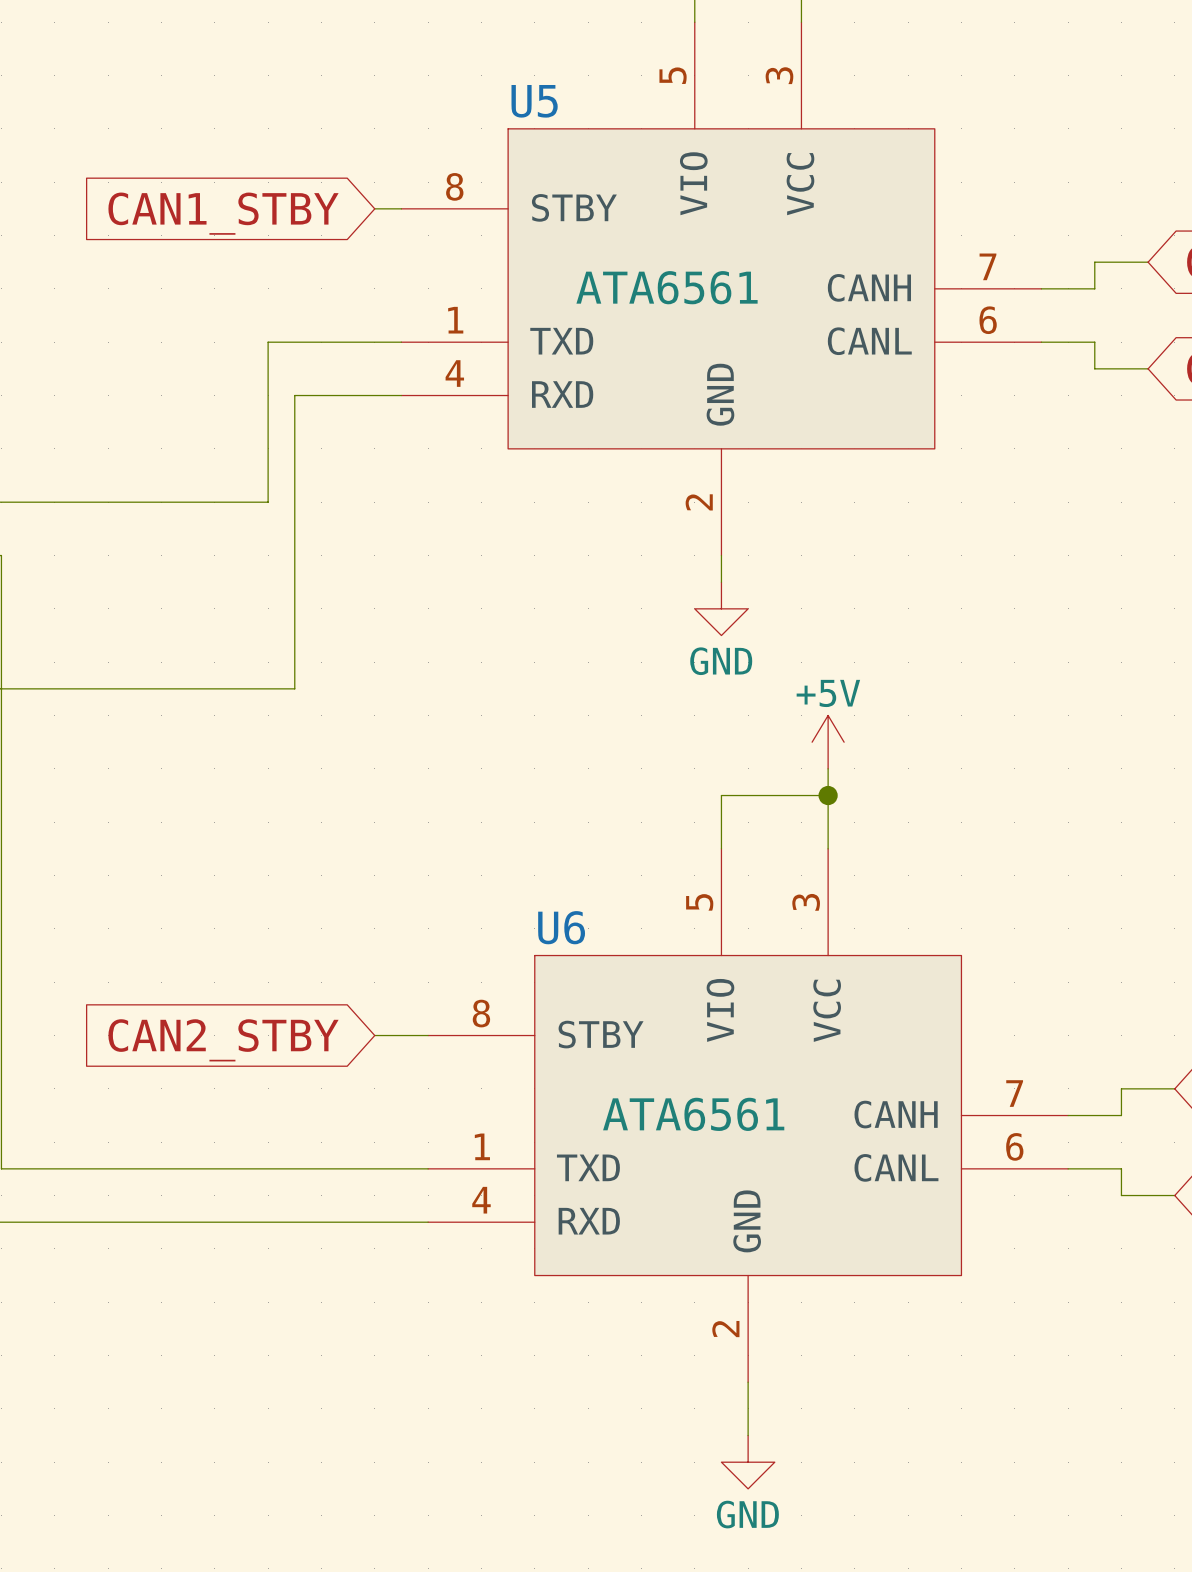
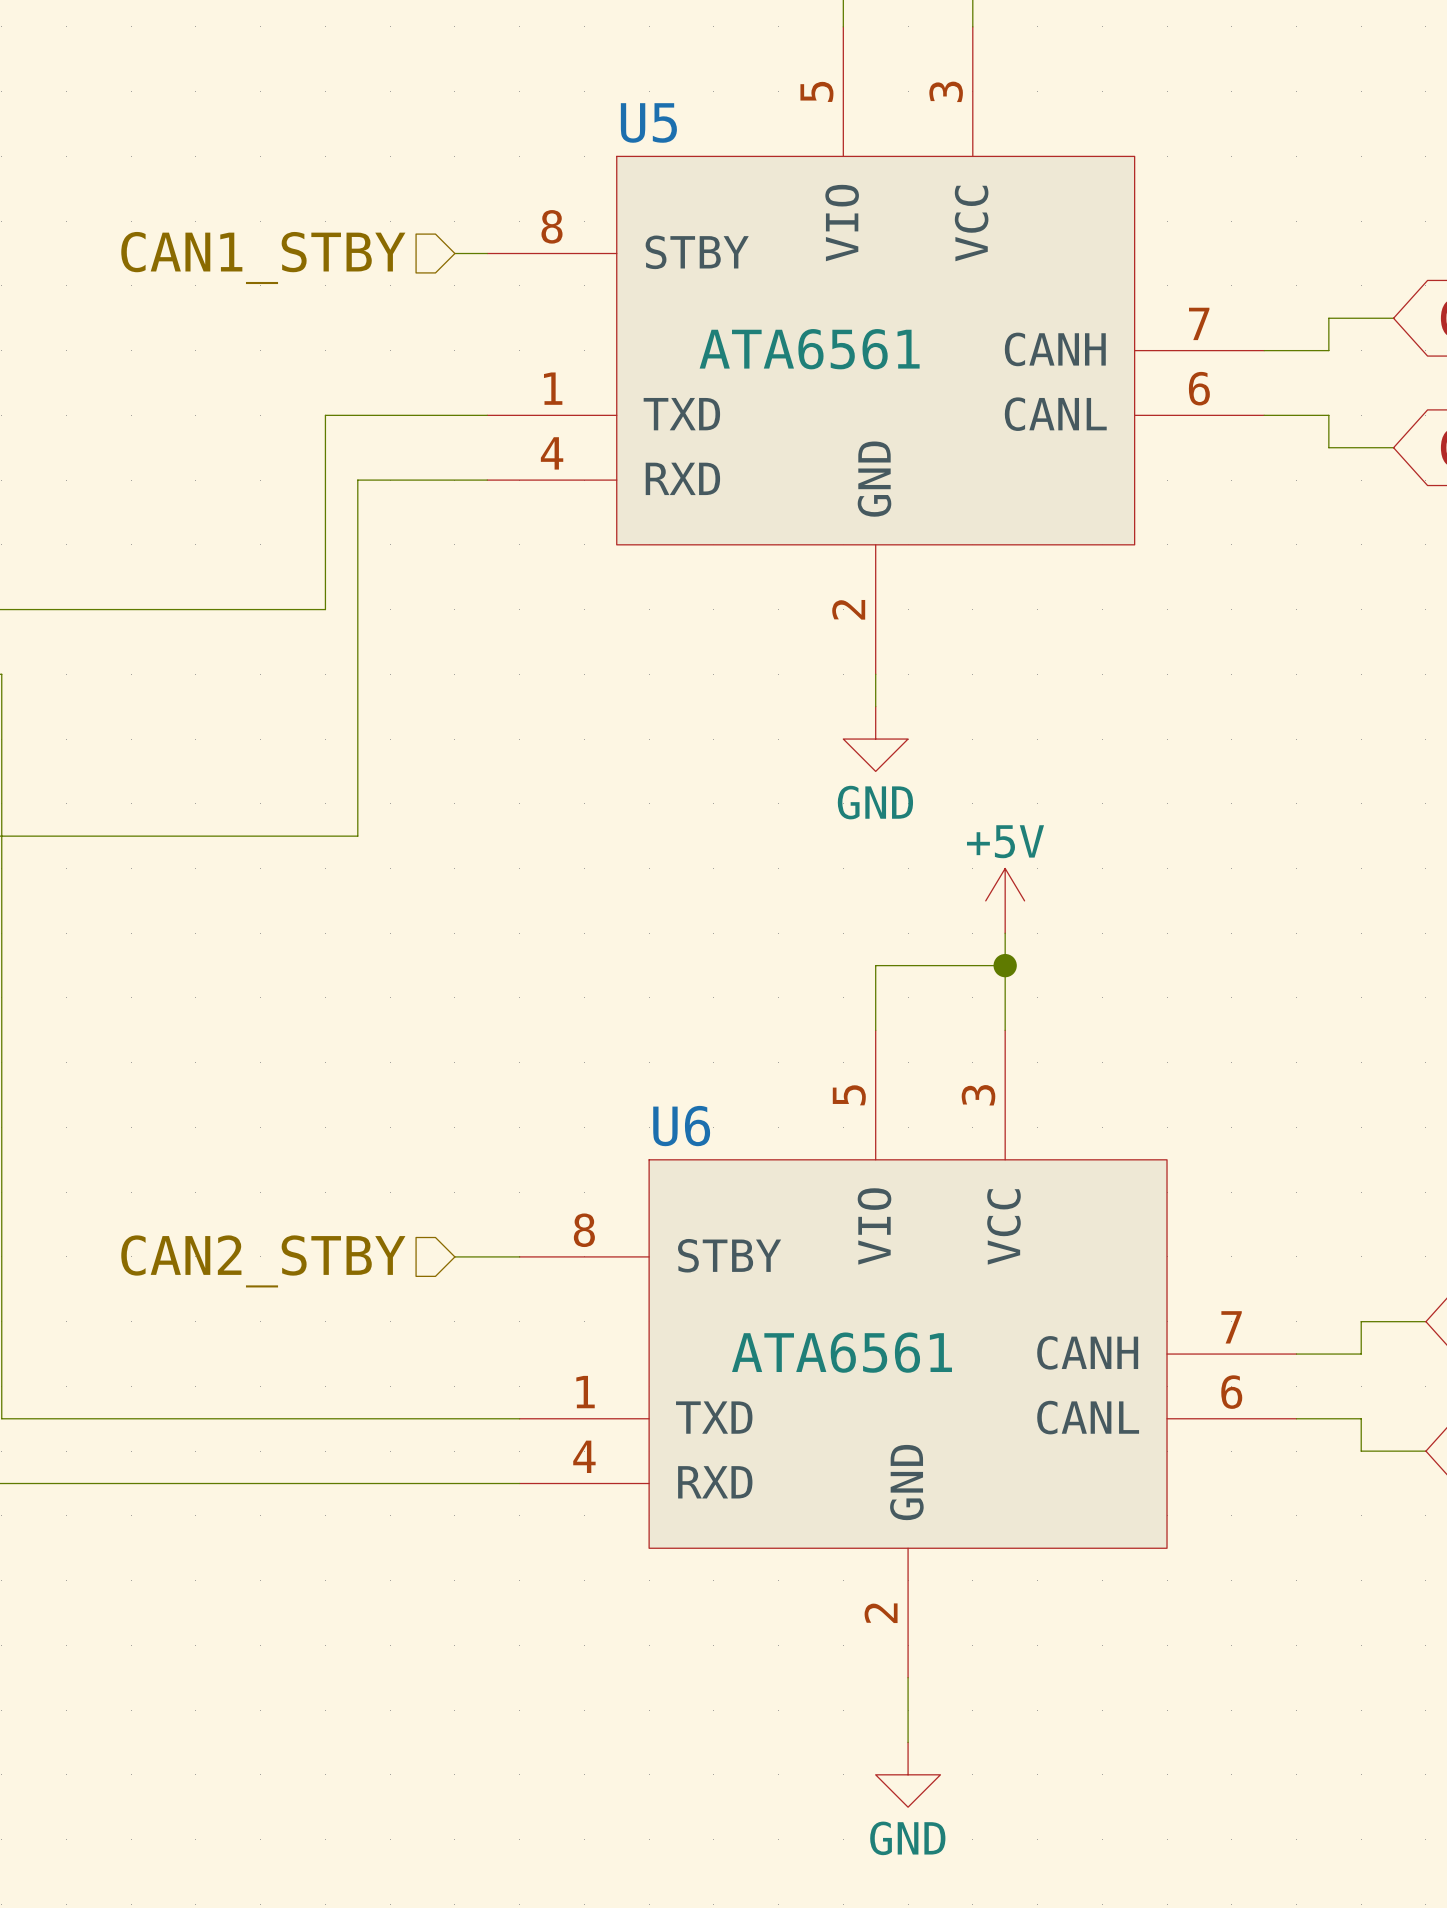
hierarchical label: none -> CAN1_STBY (263, 257)
global label: CAN1_STBY (223, 213) -> none
hierarchical label: none -> CAN2_STBY (263, 1261)
global label: CAN2_STBY (223, 1040) -> none

